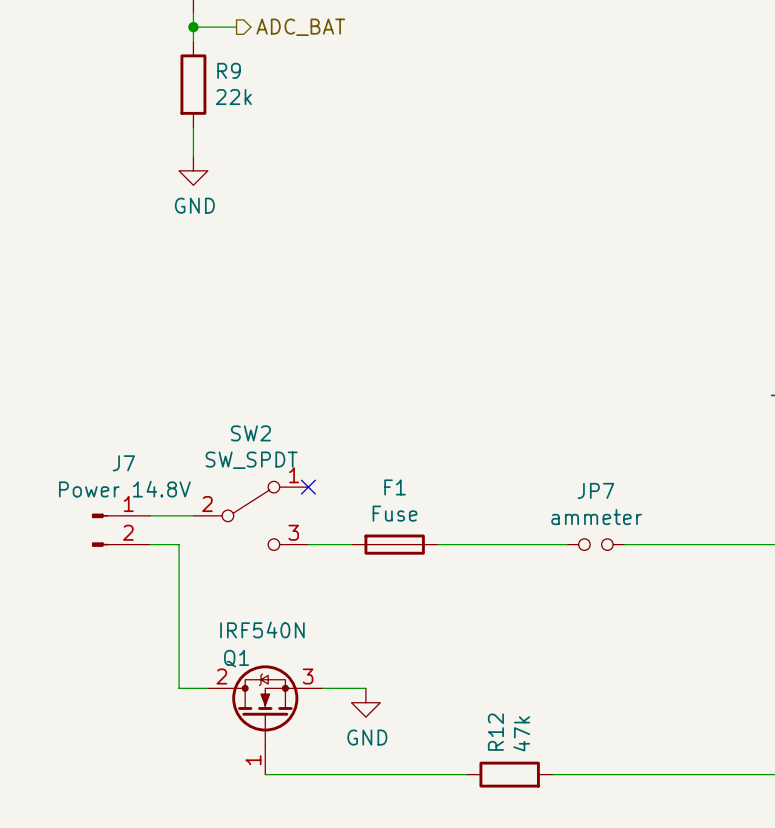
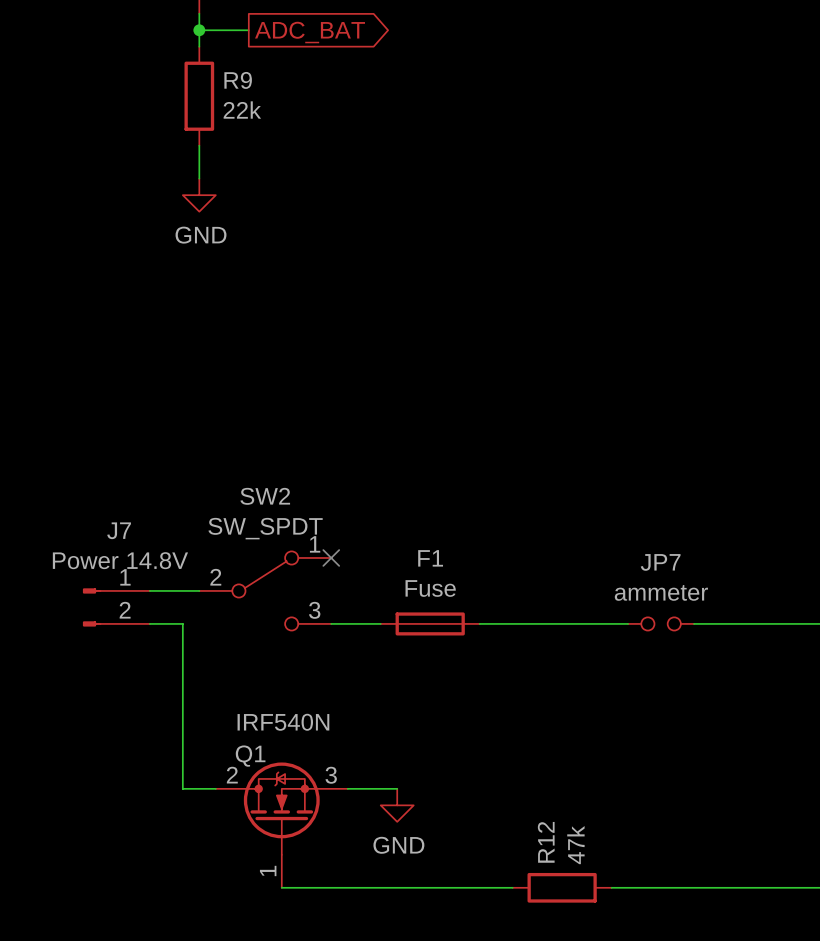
global label: none -> ADC_BAT (310, 32)
hierarchical label: ADC_BAT (300, 27) -> none

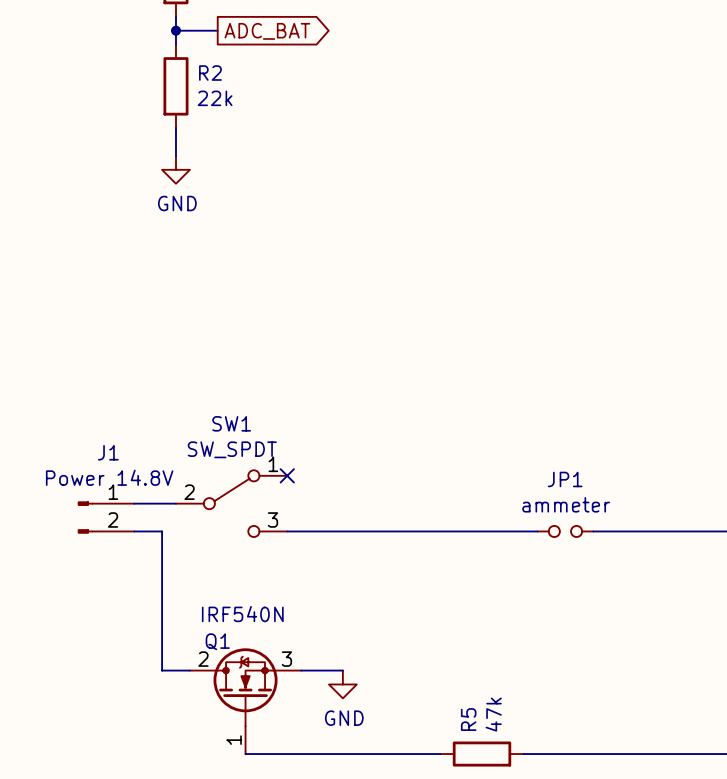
R9 name: R9 (238, 80) -> R2 (210, 73)
SW2 name: SW2 (265, 496) -> SW1 (231, 423)
J7 name: J7 (119, 530) -> J1 (108, 452)
JP7 name: JP7 (660, 562) -> JP1 (565, 479)
F1: Fuse (430, 623) -> none
R12 name: R12 (546, 842) -> R5 (468, 719)

